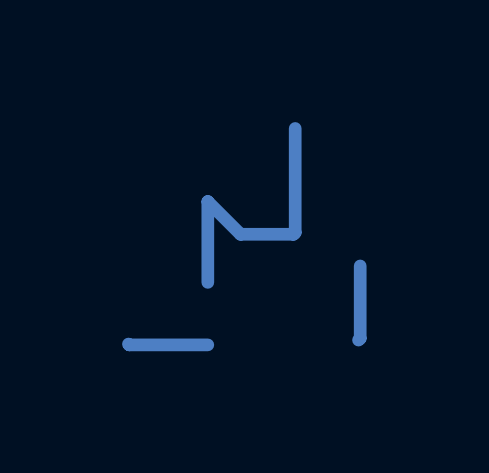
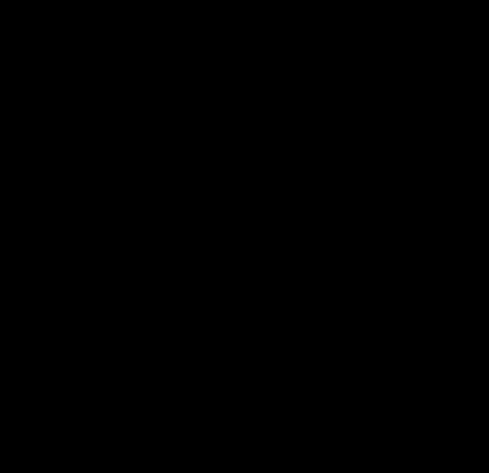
bottom track: (295, 128) (295, 232) (293, 234) (240, 234) (207, 201) (207, 282) -> none
bottom track: (360, 265) (360, 338) (358, 340) -> none
bottom track: (128, 344) (207, 344) -> none

